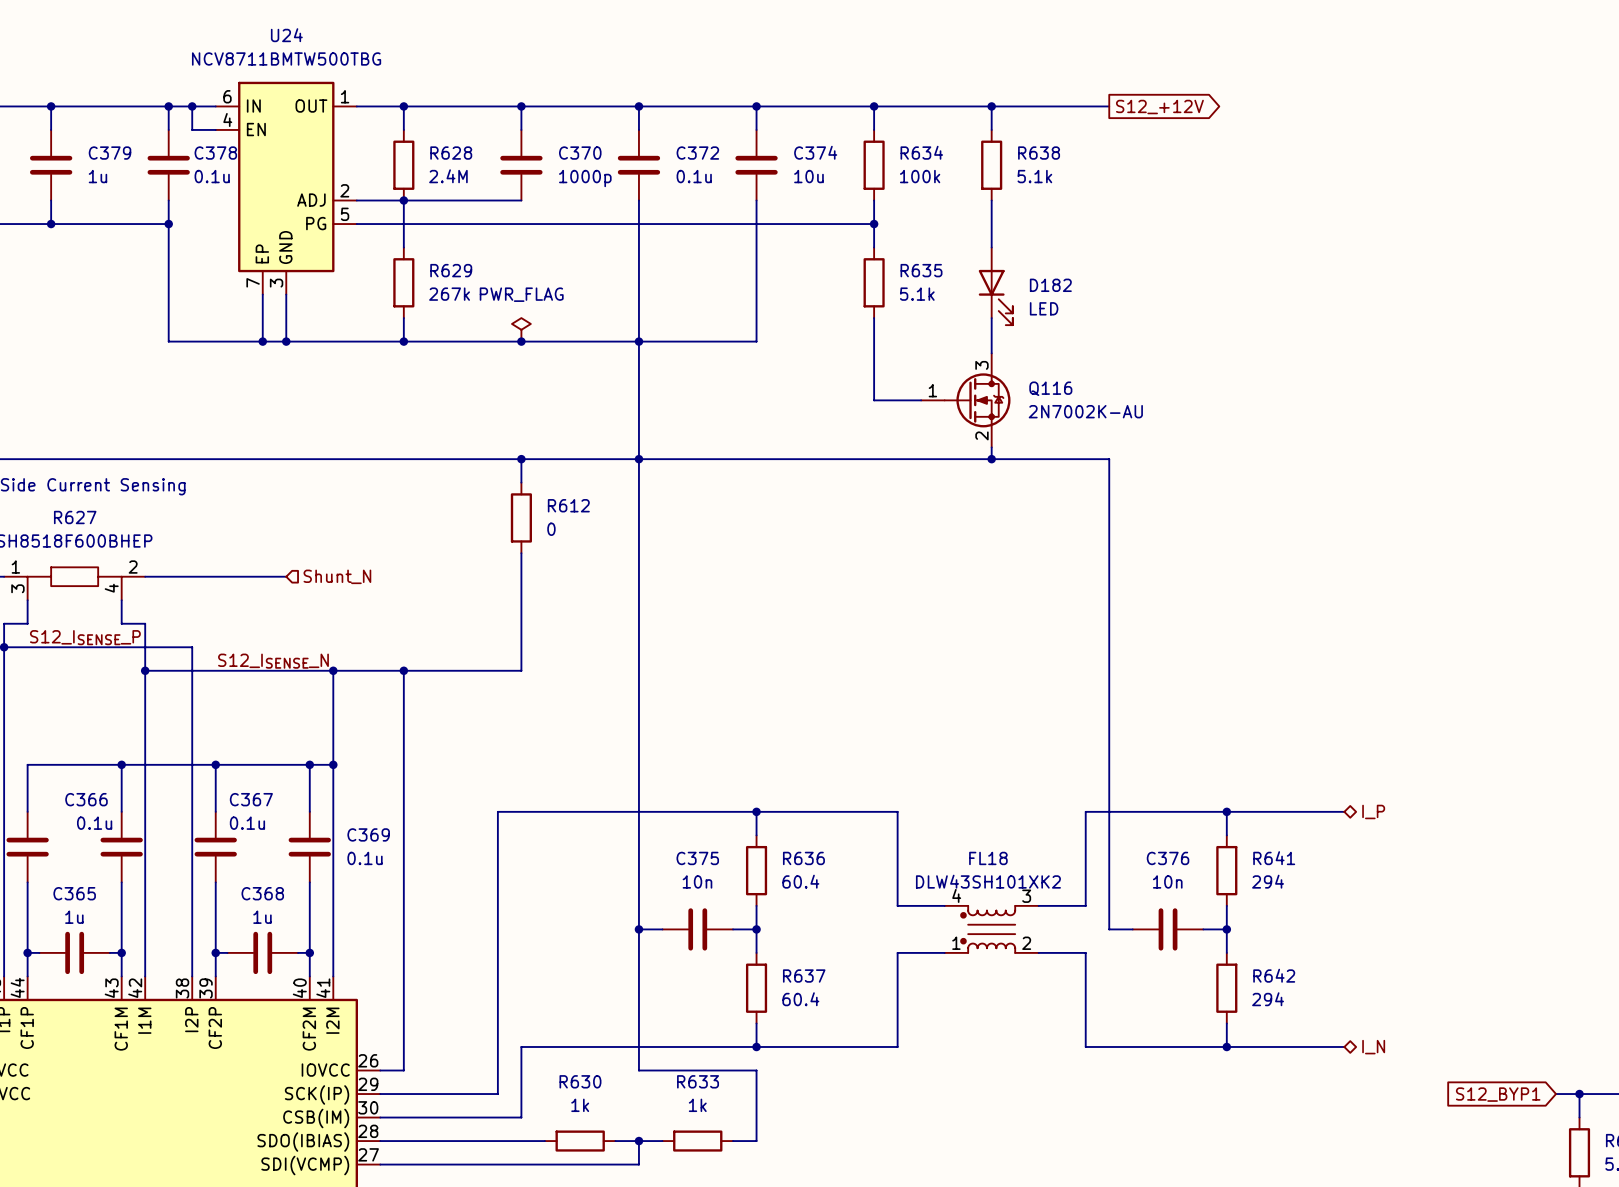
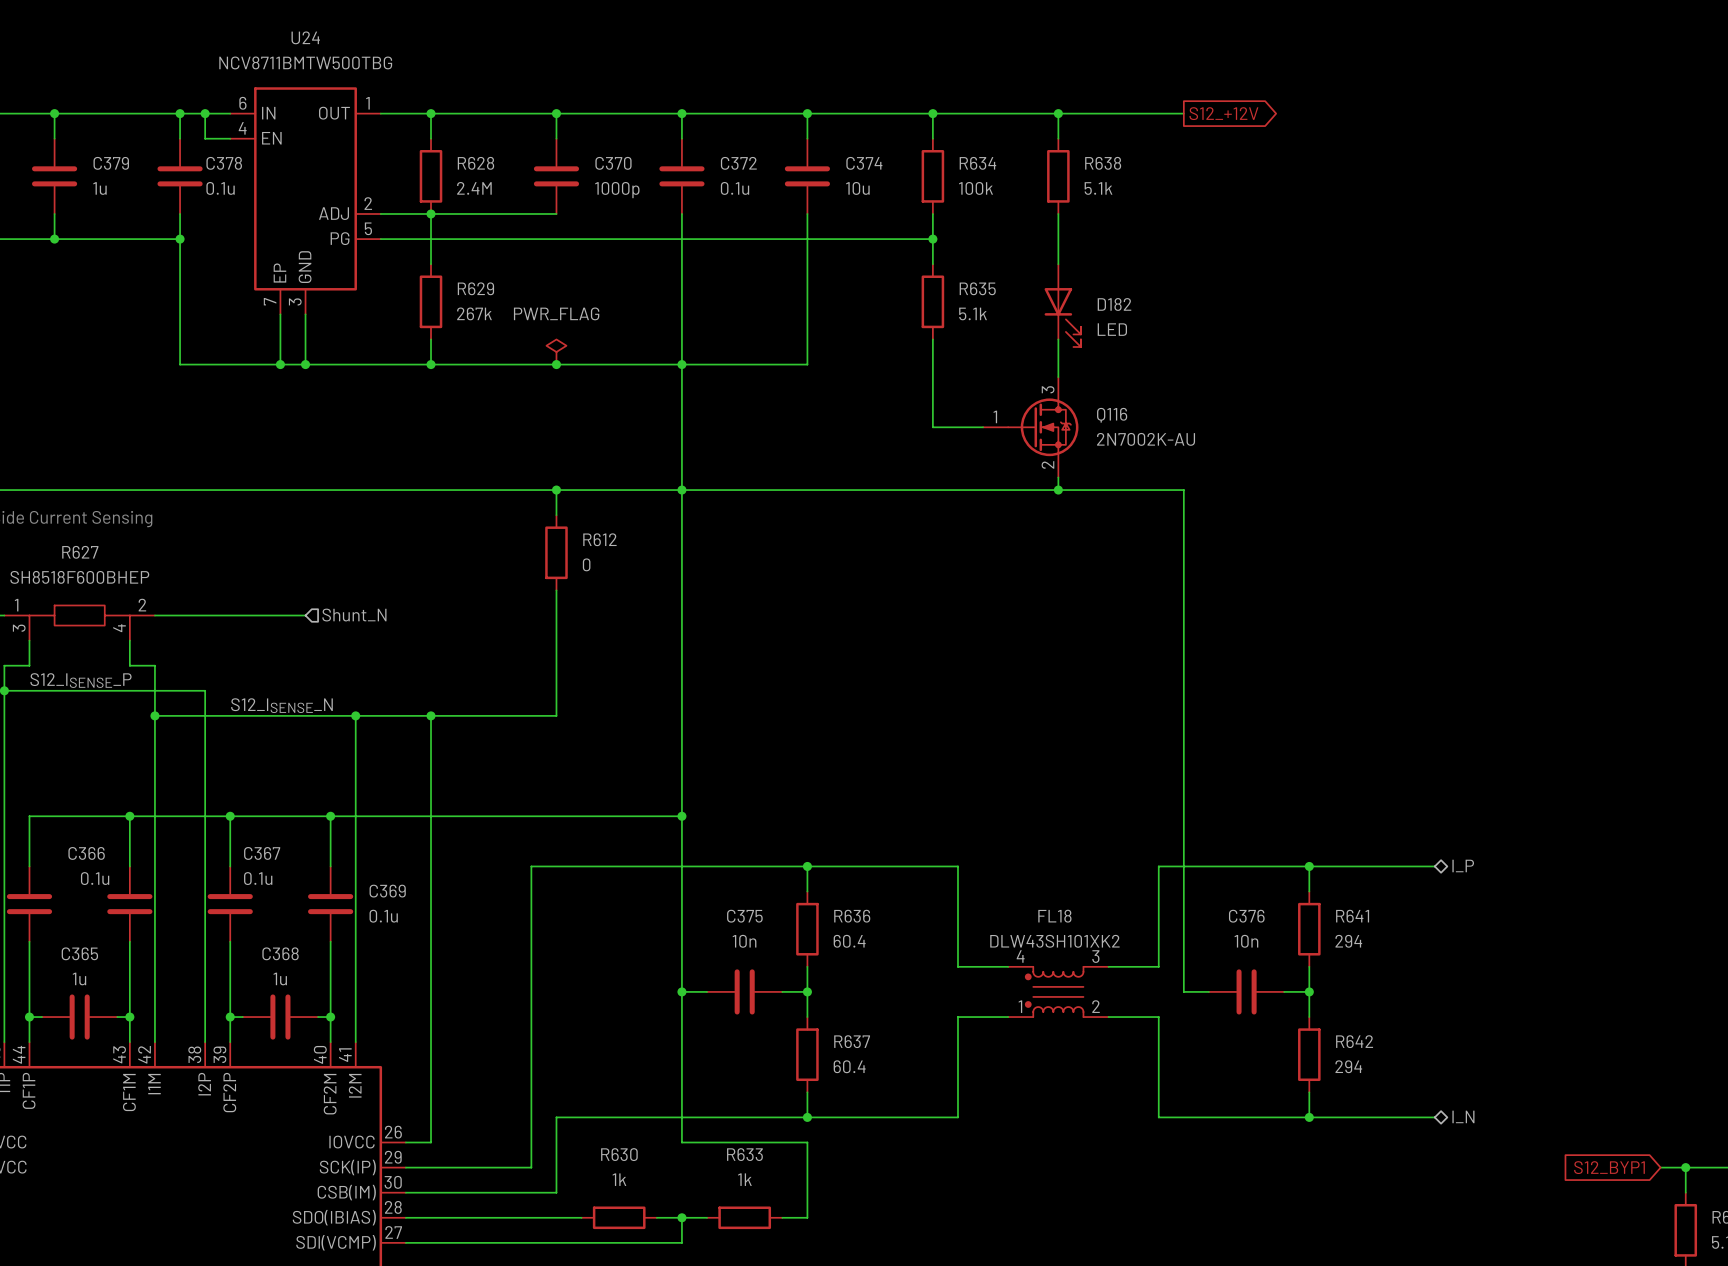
wire: none -> (355, 816) (681, 816)
junction: (333, 764) -> none
junction: none -> (681, 816)

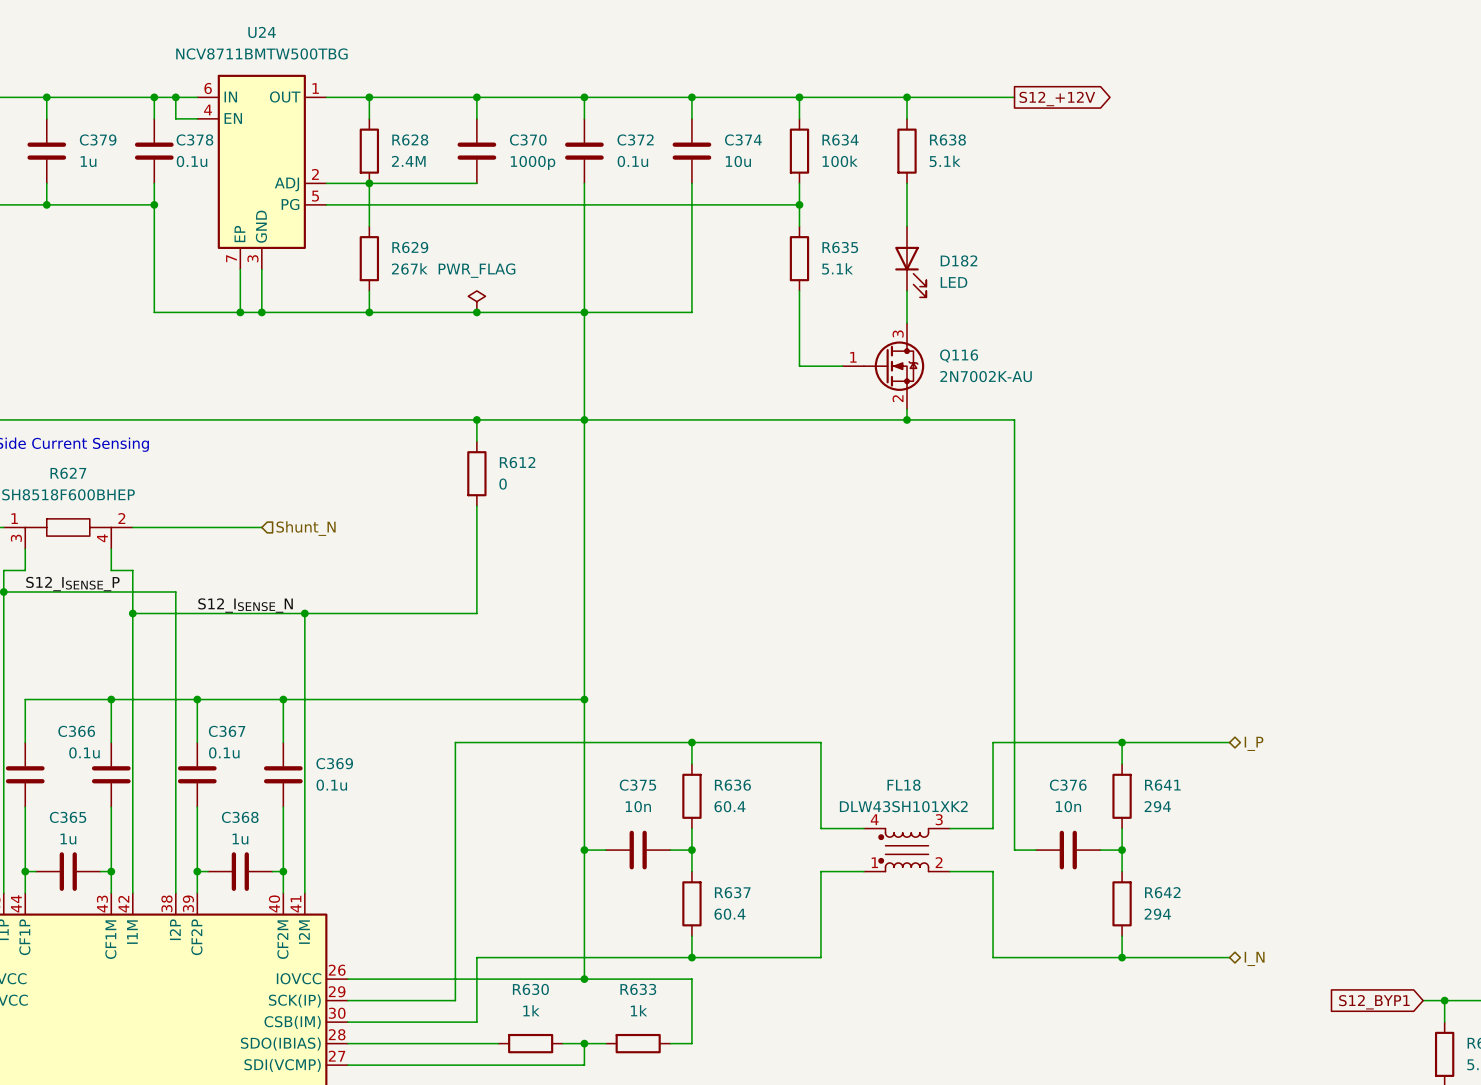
wire: (431, 715) (431, 1142) -> (584, 979) (369, 979)
junction: (431, 715) -> none
junction: none -> (584, 979)

